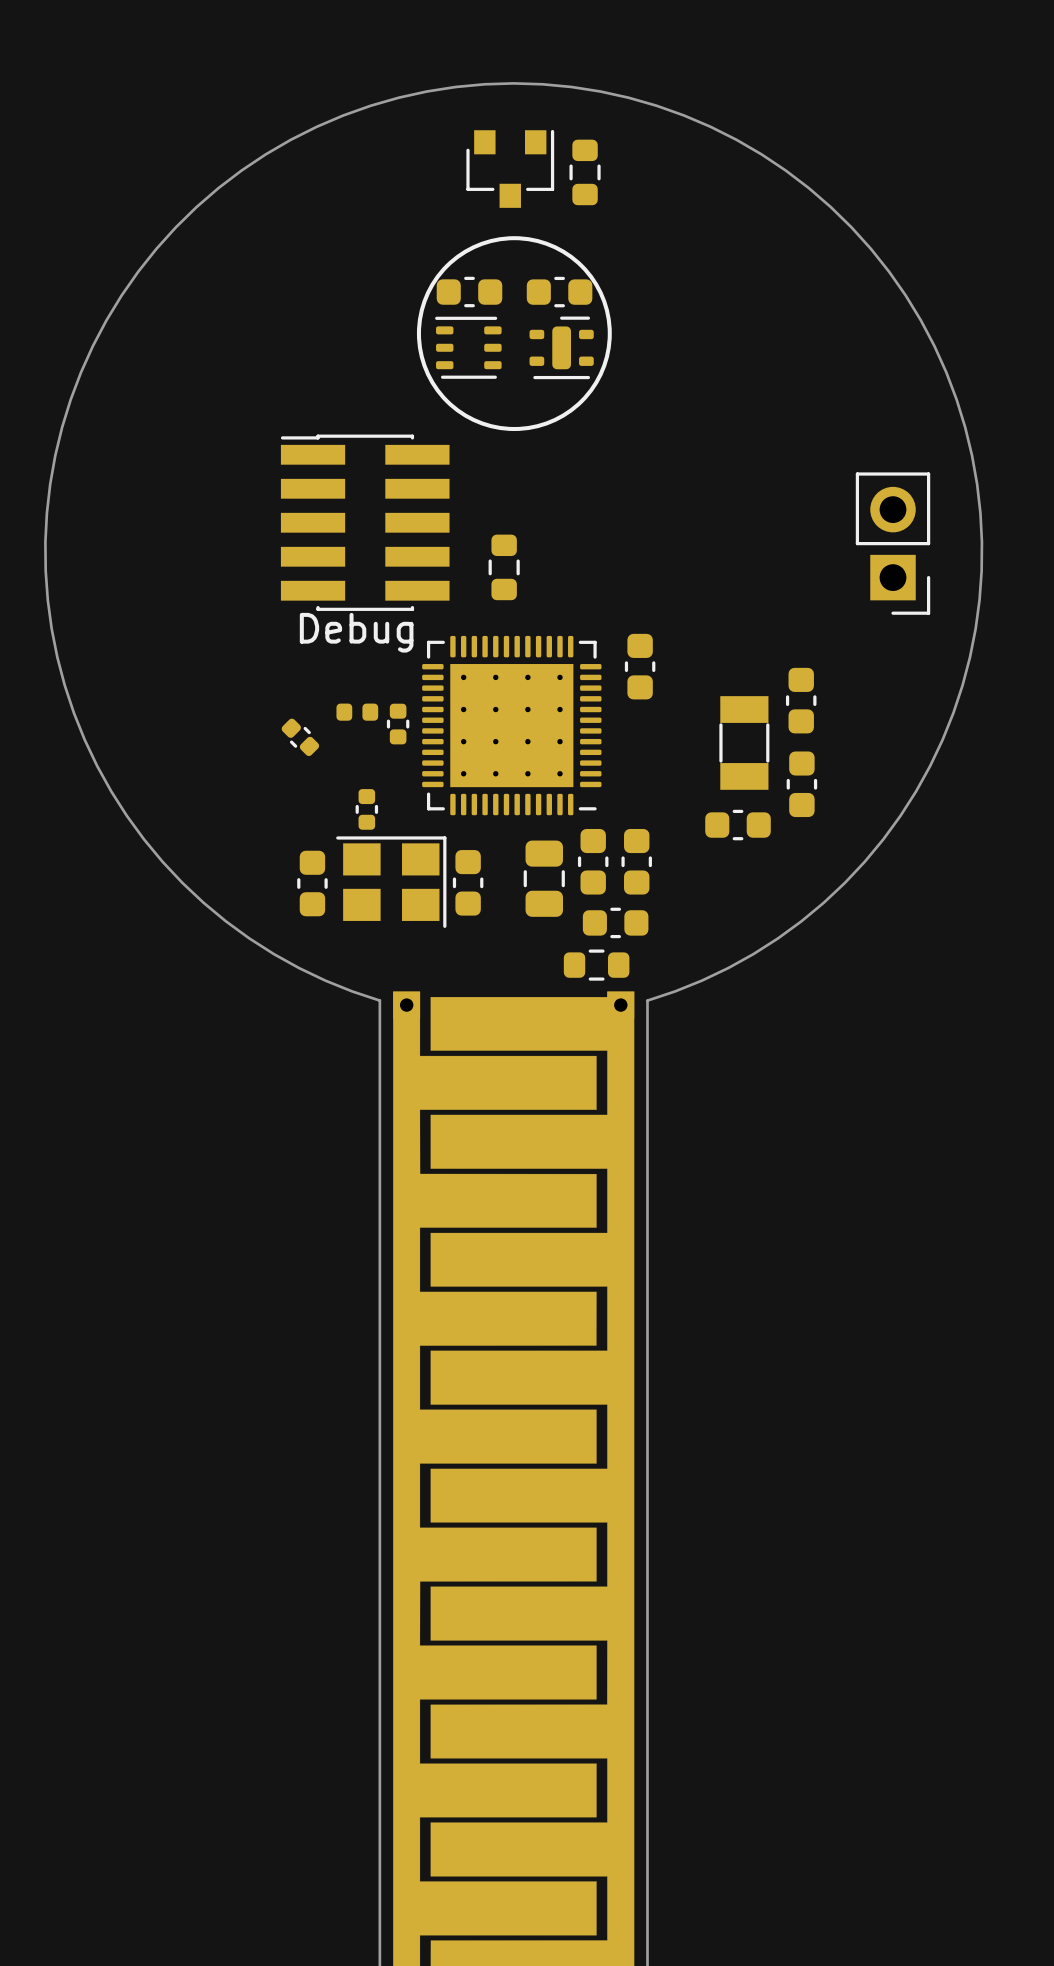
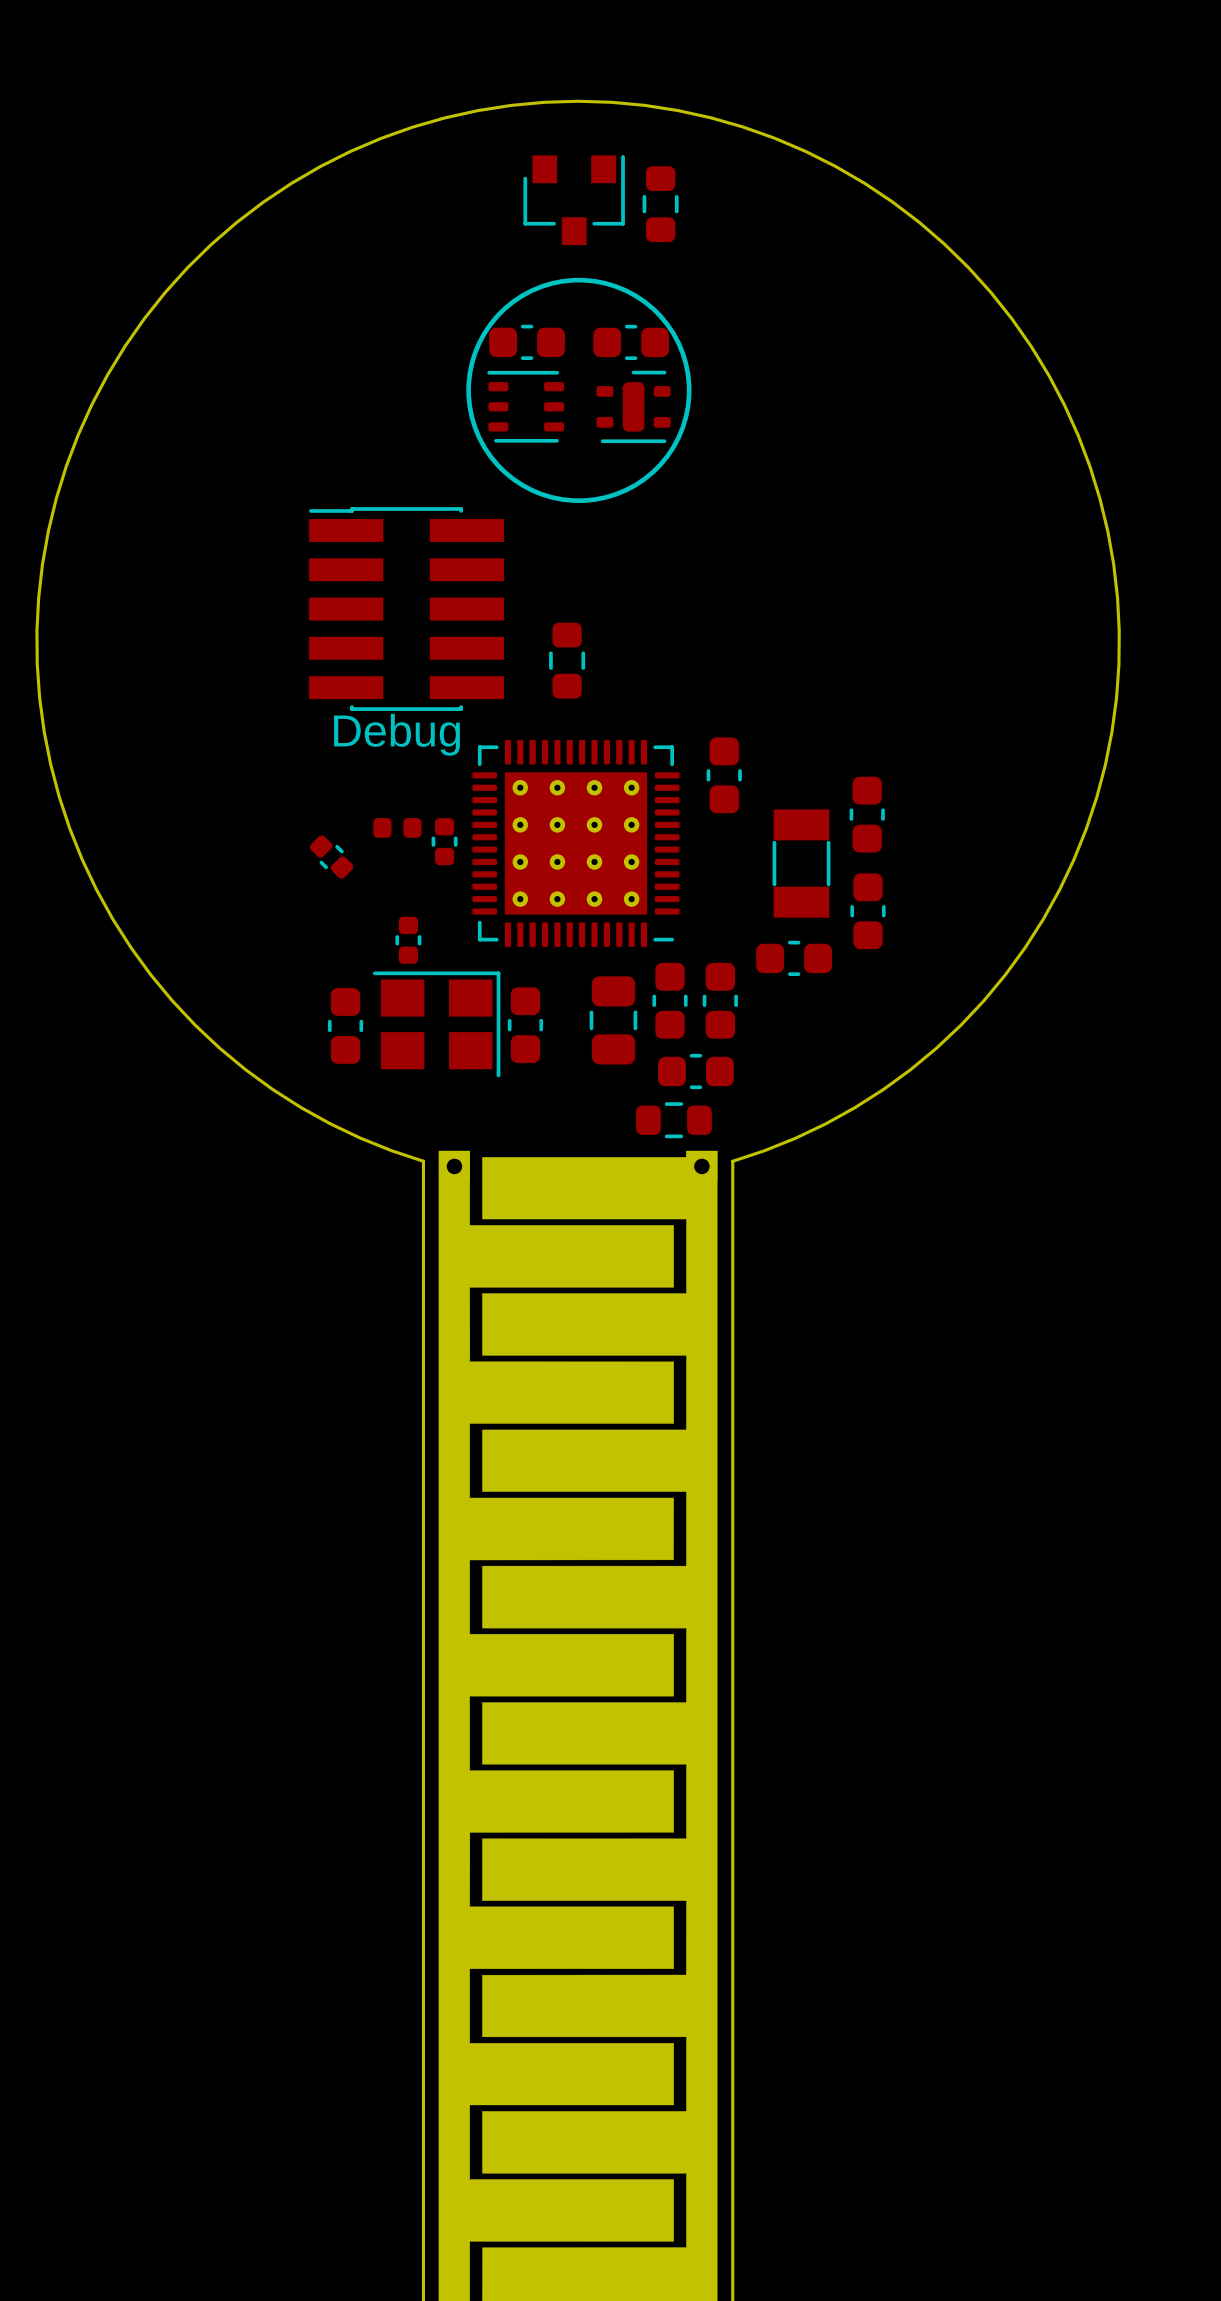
part: (893, 543) -> none
part position: (801, 700) -> (867, 814)
part position: (744, 742) -> (801, 863)
part: none -> (868, 911)
part: (801, 784) -> none
part: none -> (794, 958)
part: (738, 825) -> none

